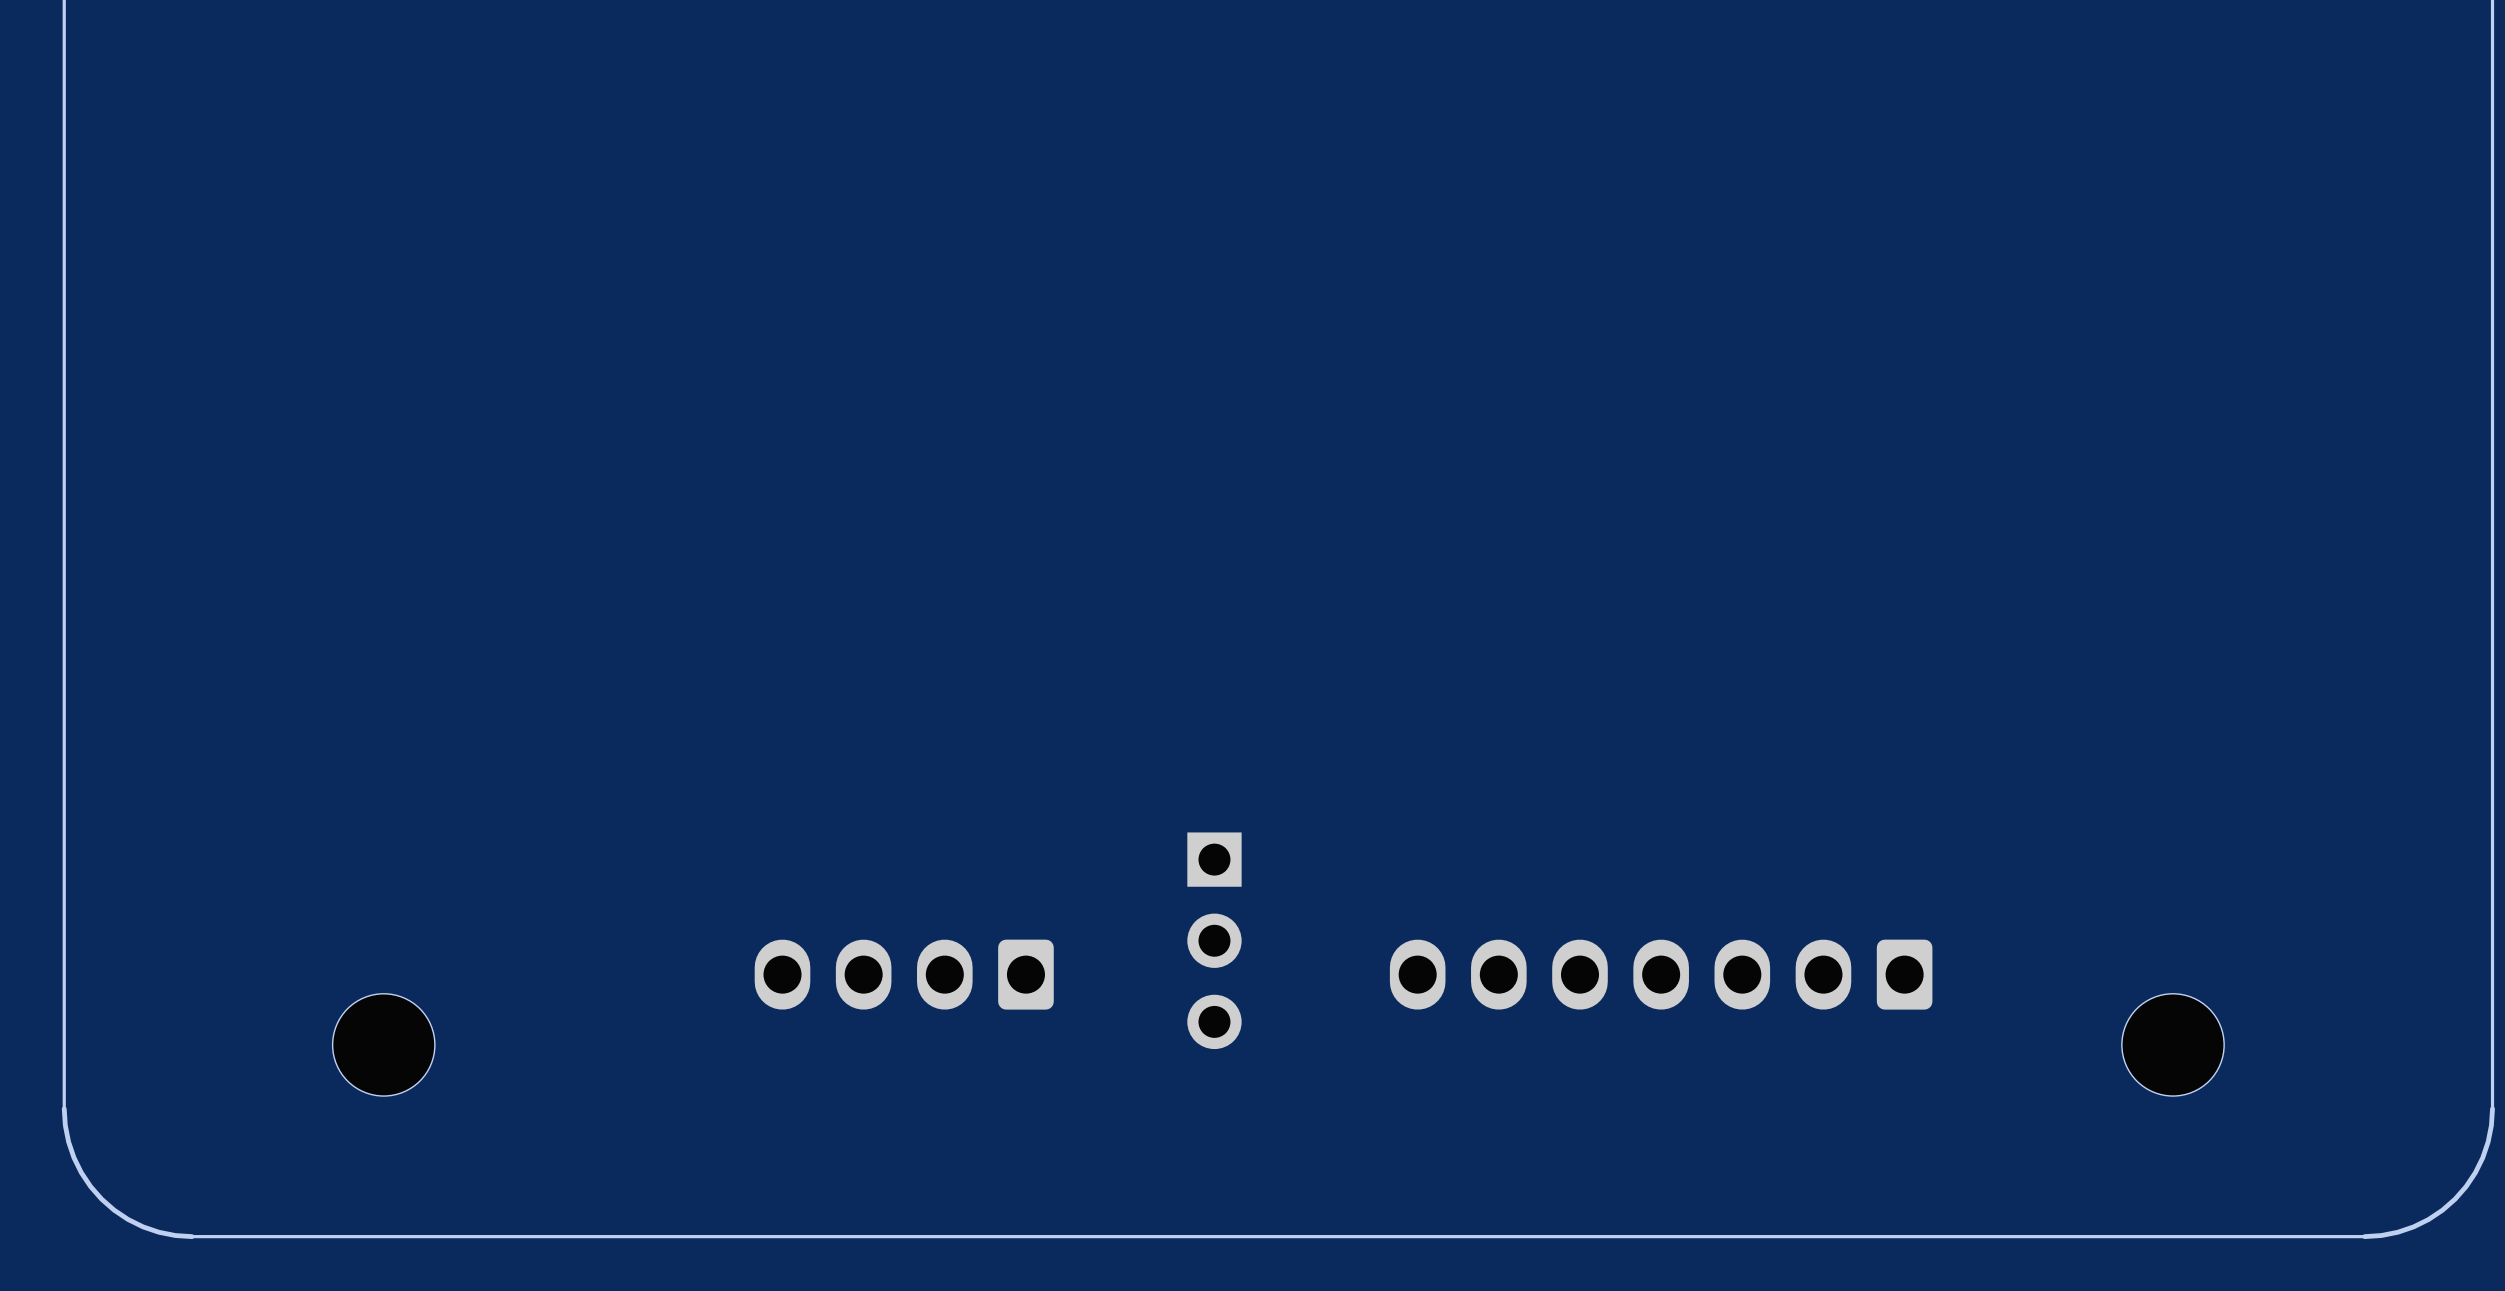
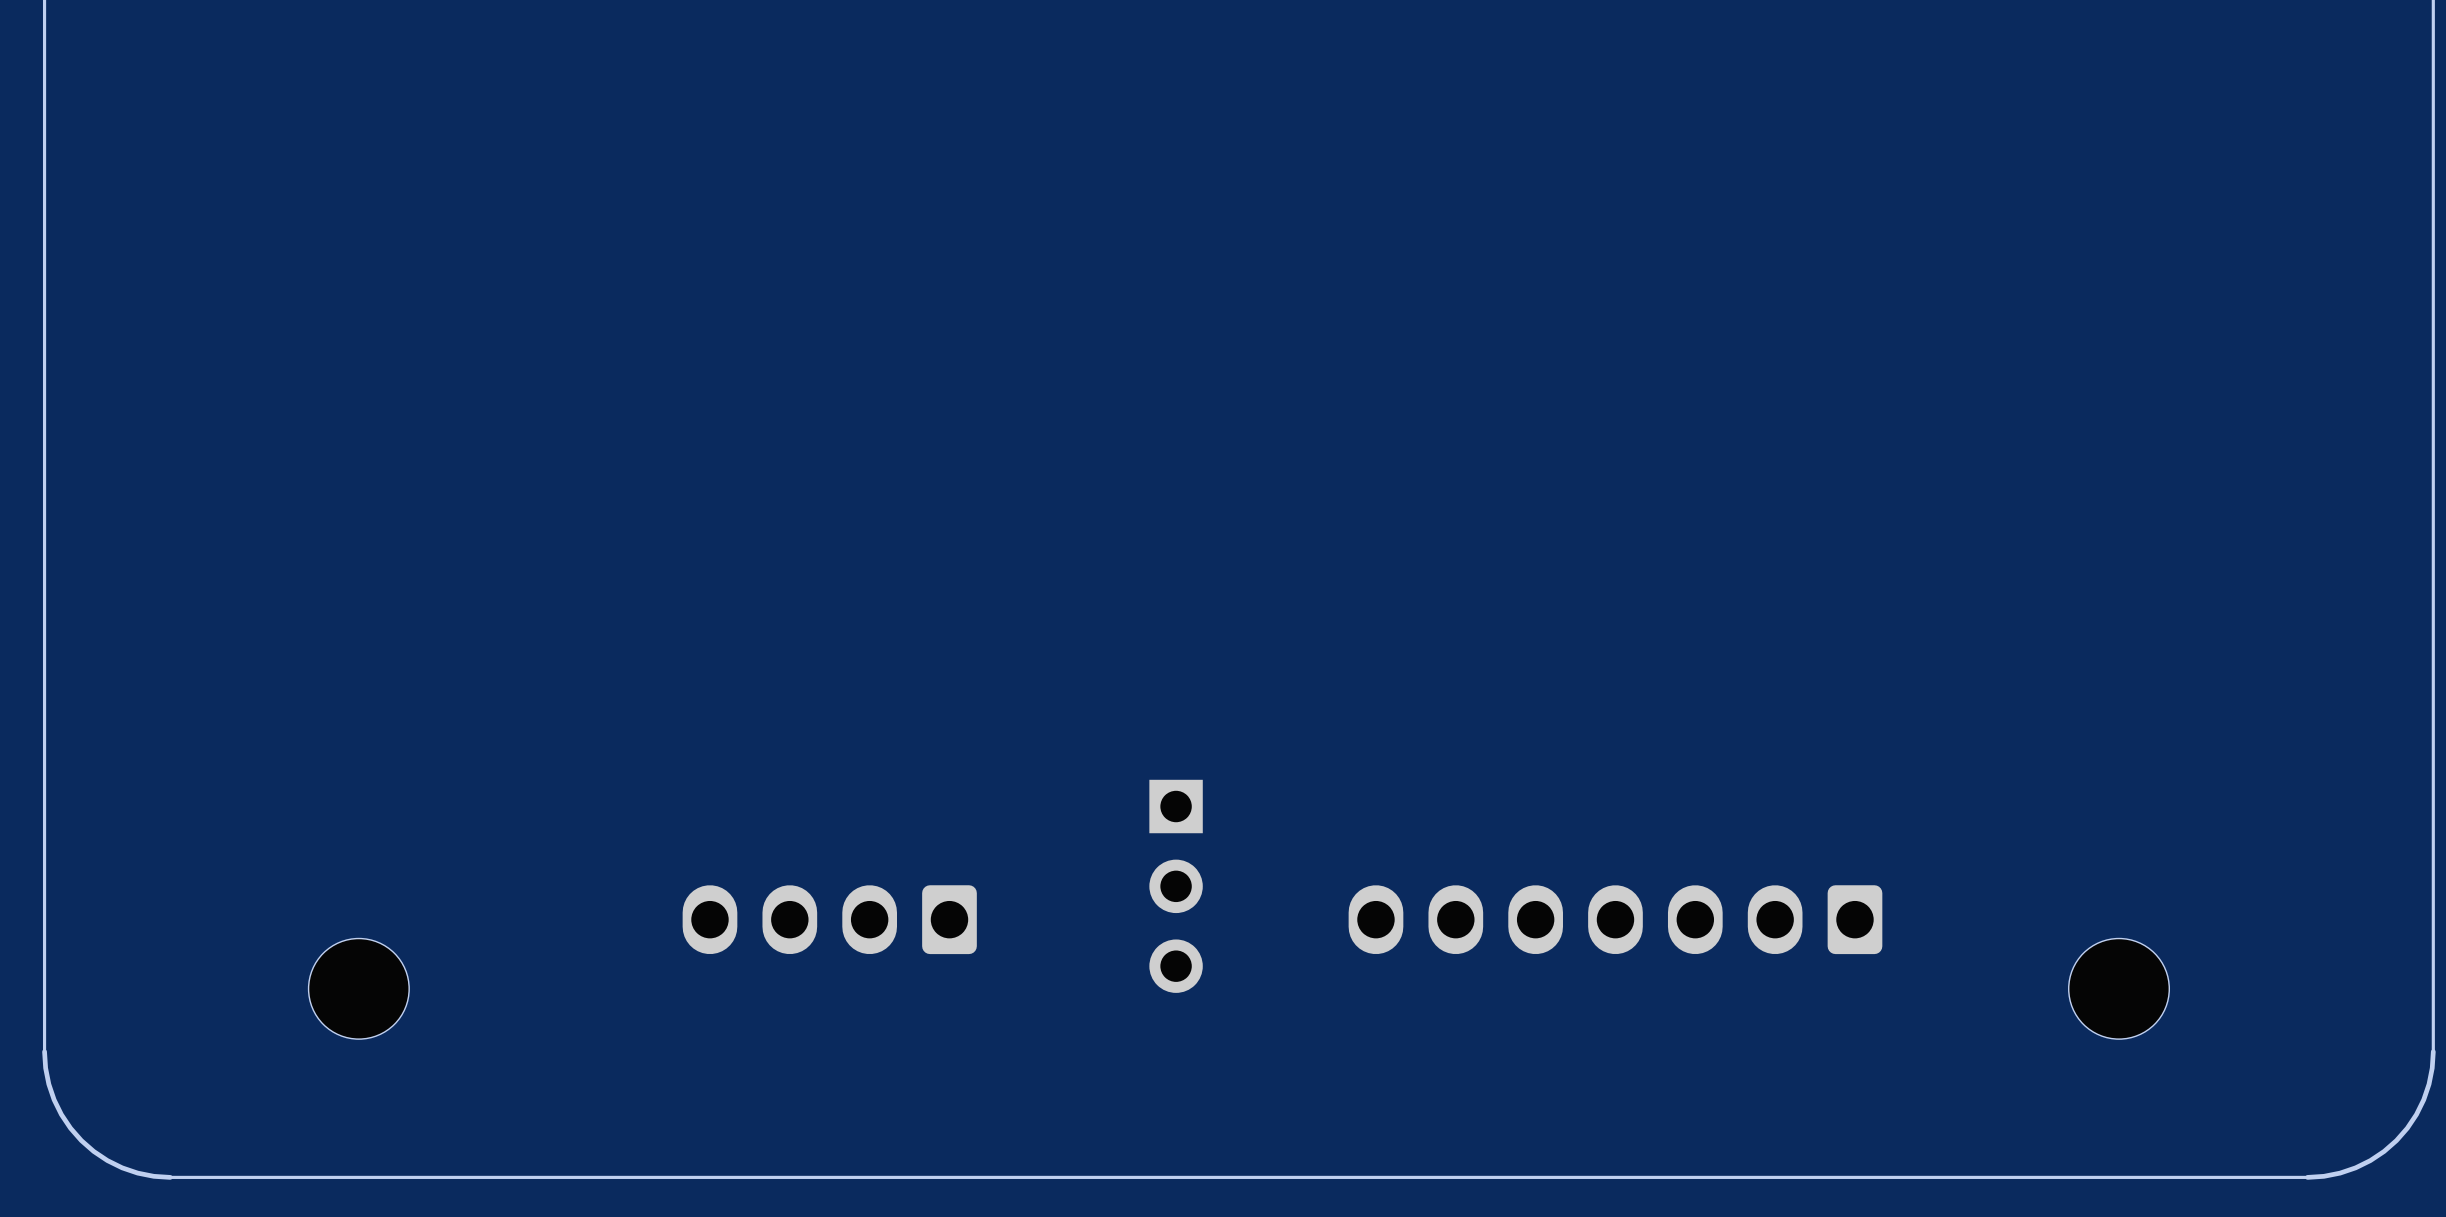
part position: (904, 974) -> (829, 919)

